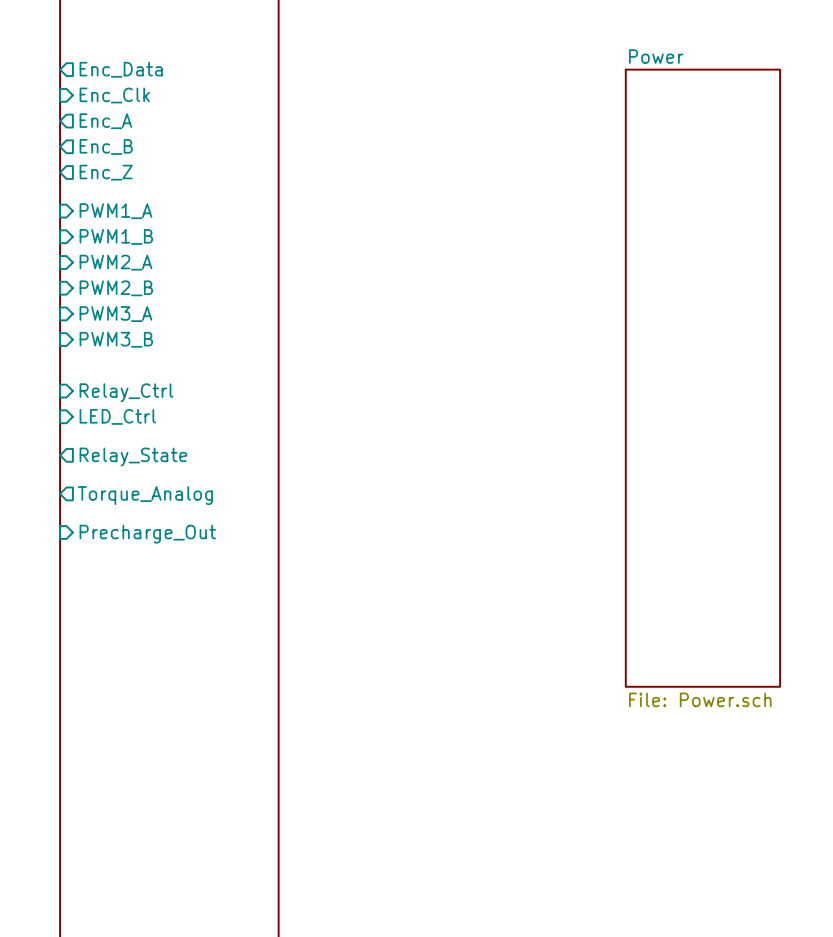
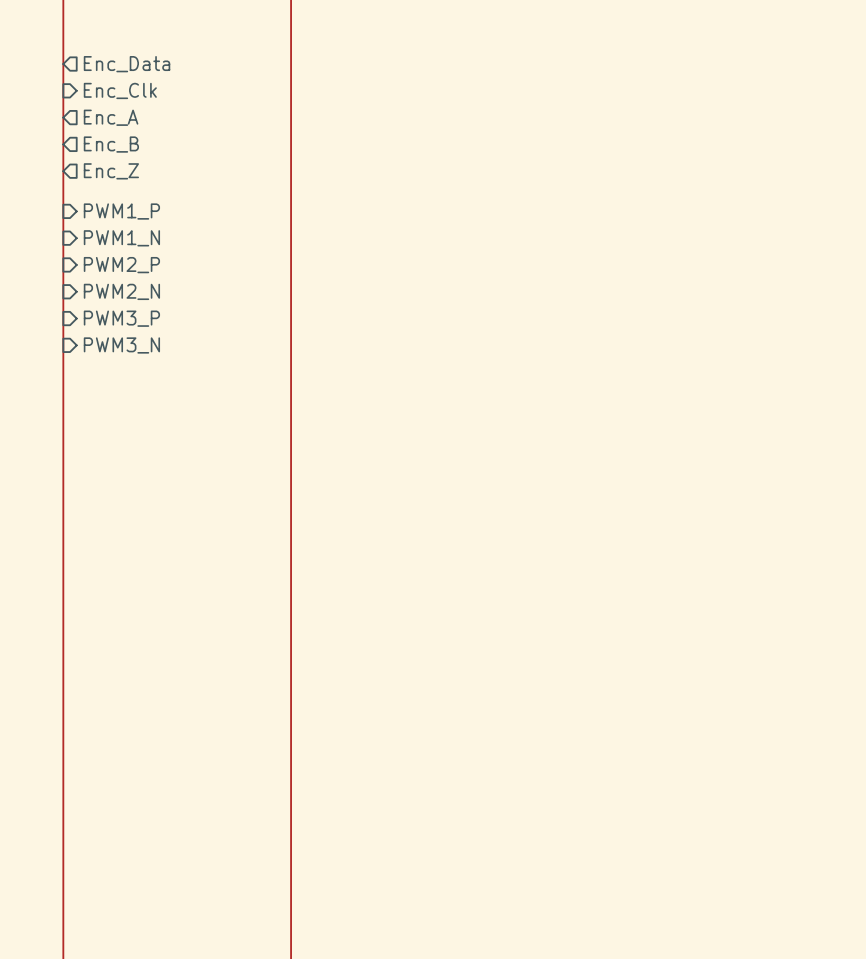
sheet pin: PWM1_A (115, 211) -> PWM1_P (121, 211)
sheet pin: PWM1_B (116, 236) -> PWM1_N (121, 238)
sheet pin: PWM2_A (115, 262) -> PWM2_P (121, 265)
sheet pin: PWM2_B (116, 288) -> PWM2_N (121, 291)
sheet pin: PWM3_A (115, 314) -> PWM3_P (121, 318)
sheet pin: PWM3_B (116, 339) -> PWM3_N (121, 345)
sheet Power: File: Power.sch (702, 378) -> none
sheet pin: Relay_Ctrl (126, 392) -> none
sheet pin: LED_Ctrl (117, 416) -> none
sheet pin: Relay_State (133, 457) -> none
sheet pin: Torque_Analog (145, 495) -> none
sheet pin: Precharge_Out (147, 534) -> none

